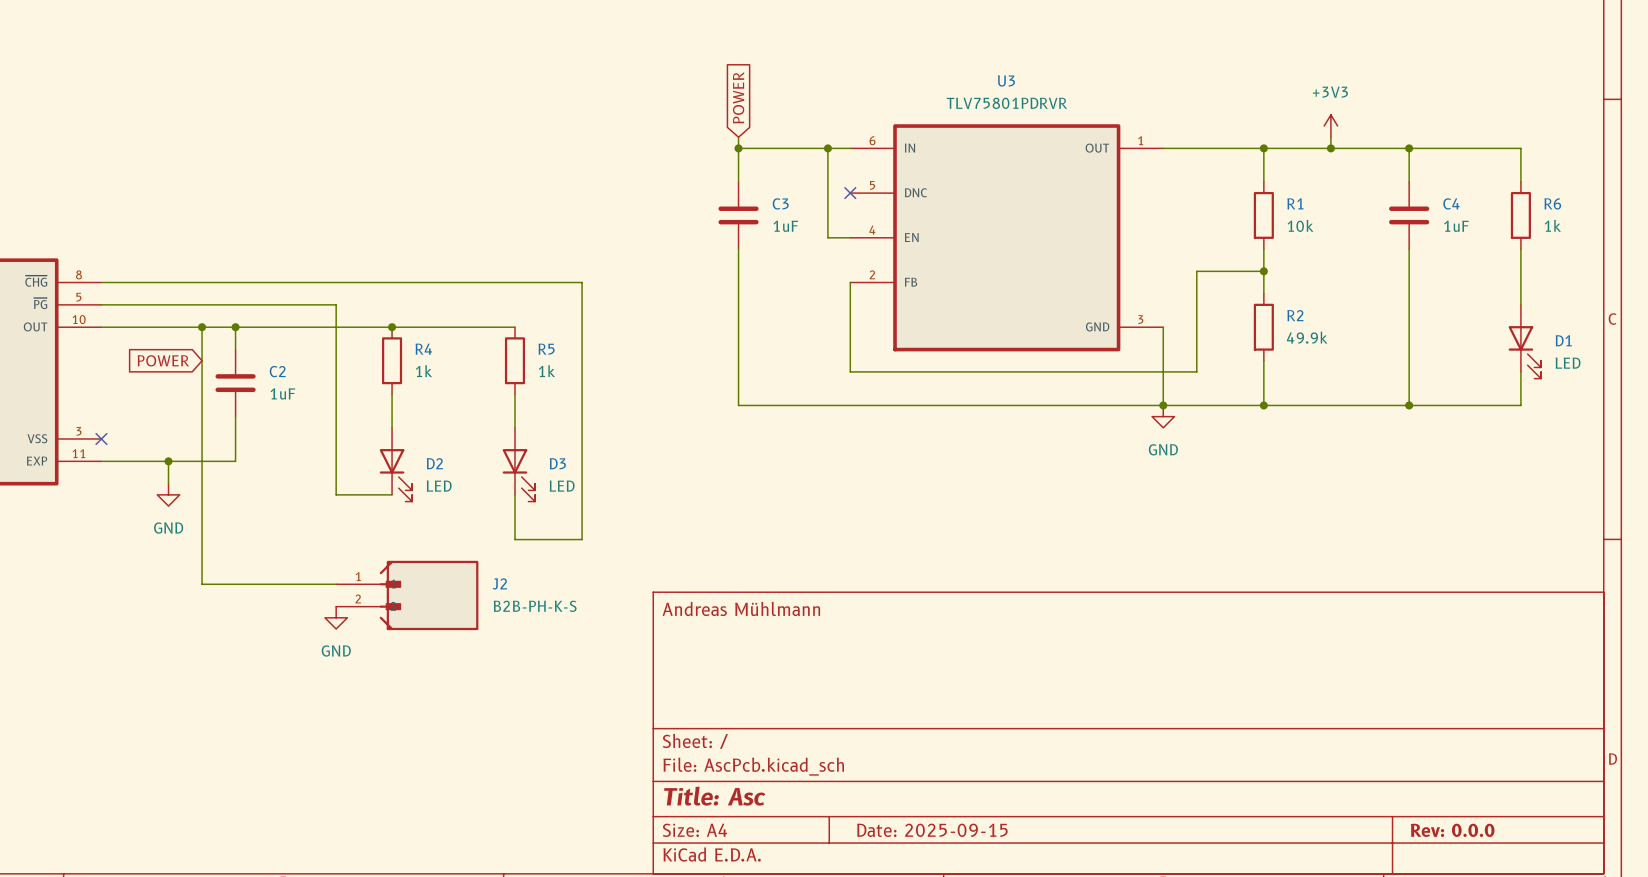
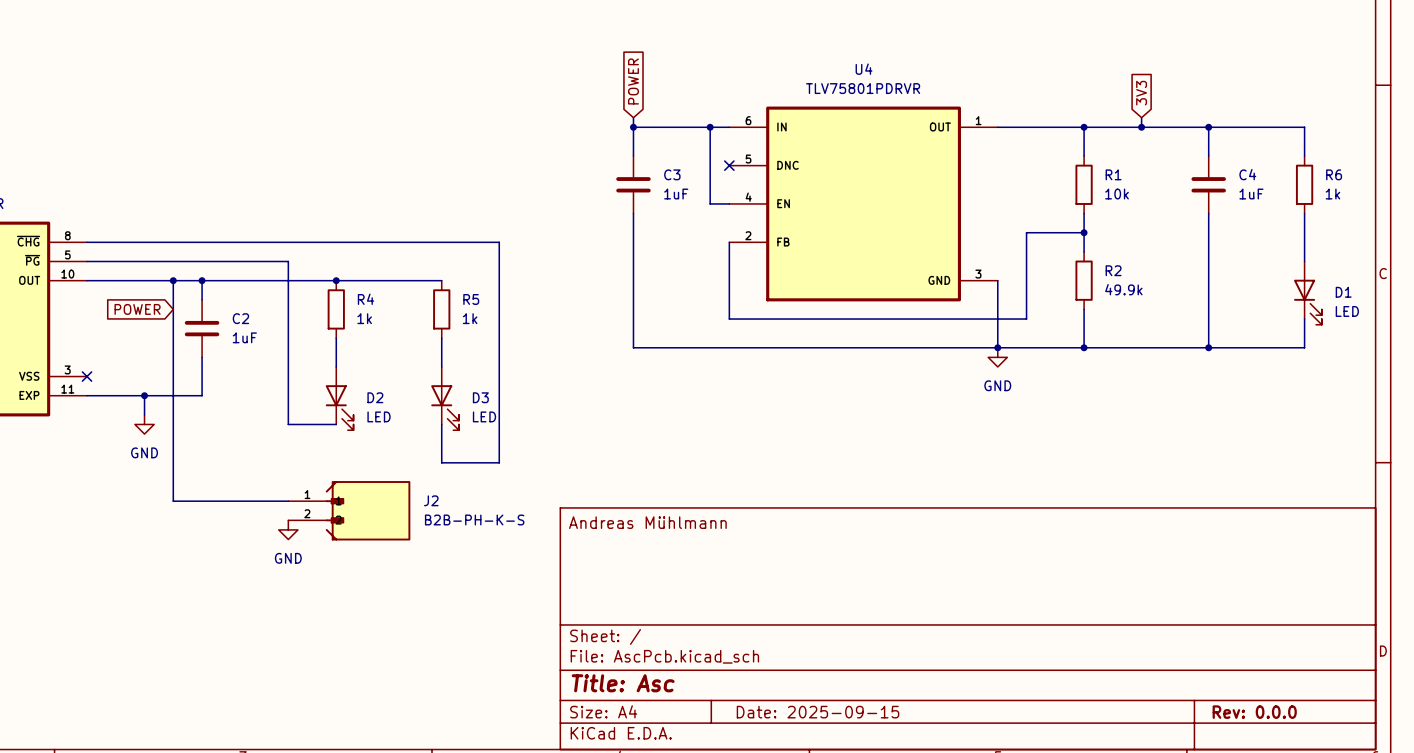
U3 name: U3 (1006, 80) -> U4 (864, 69)
global label: none -> 3V3 (1141, 93)
power symbol: +3V3 (1330, 126) -> none

